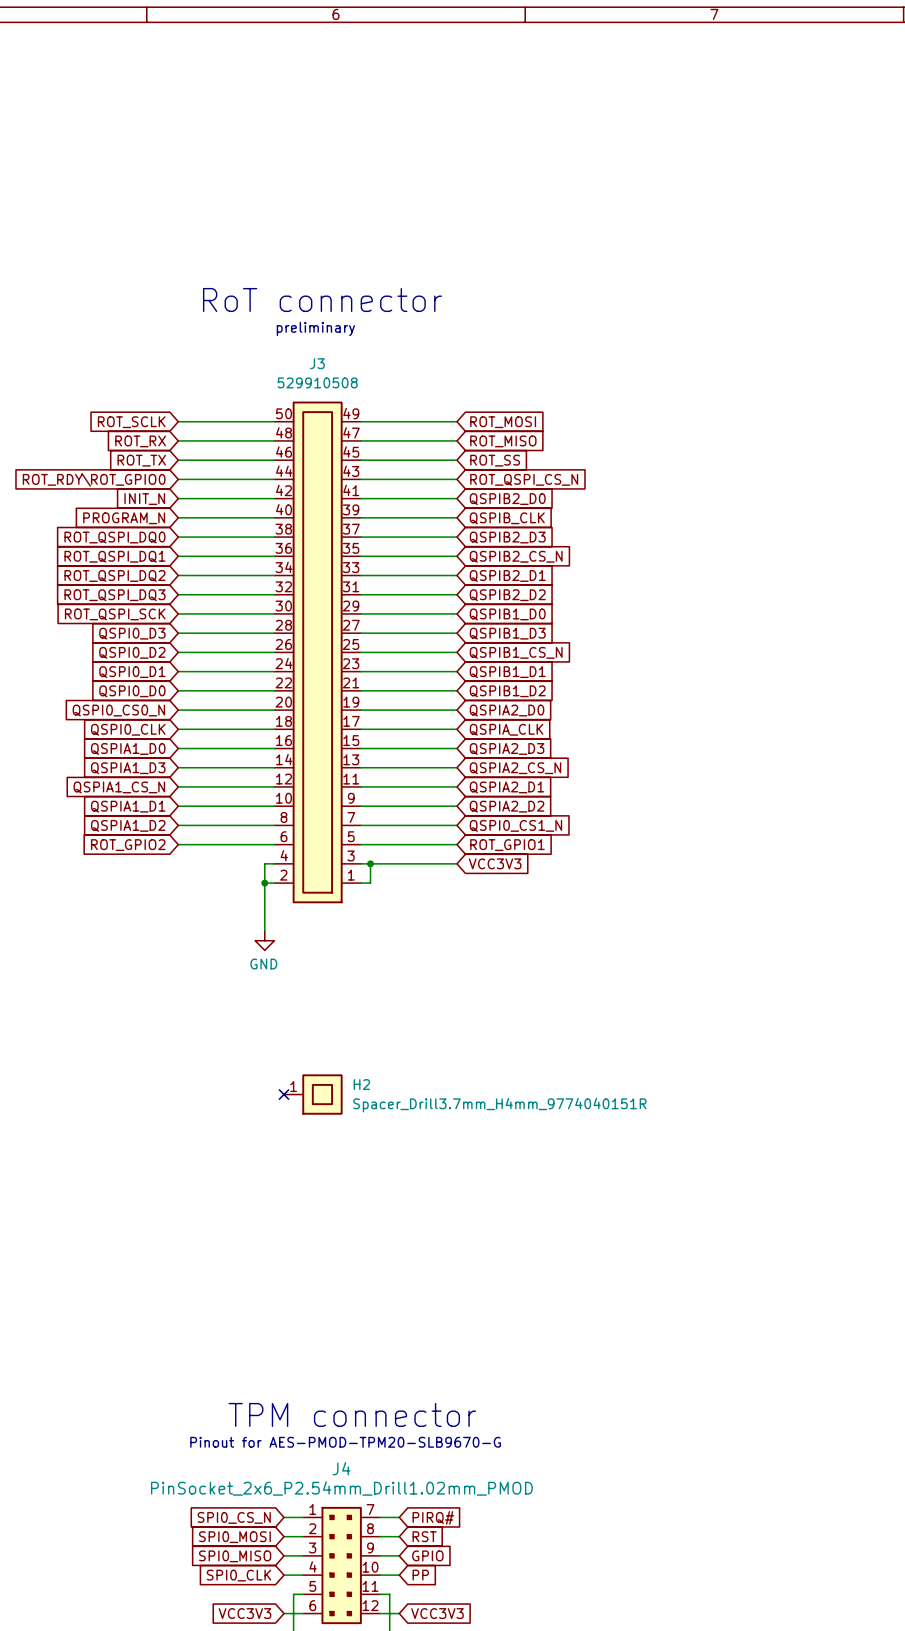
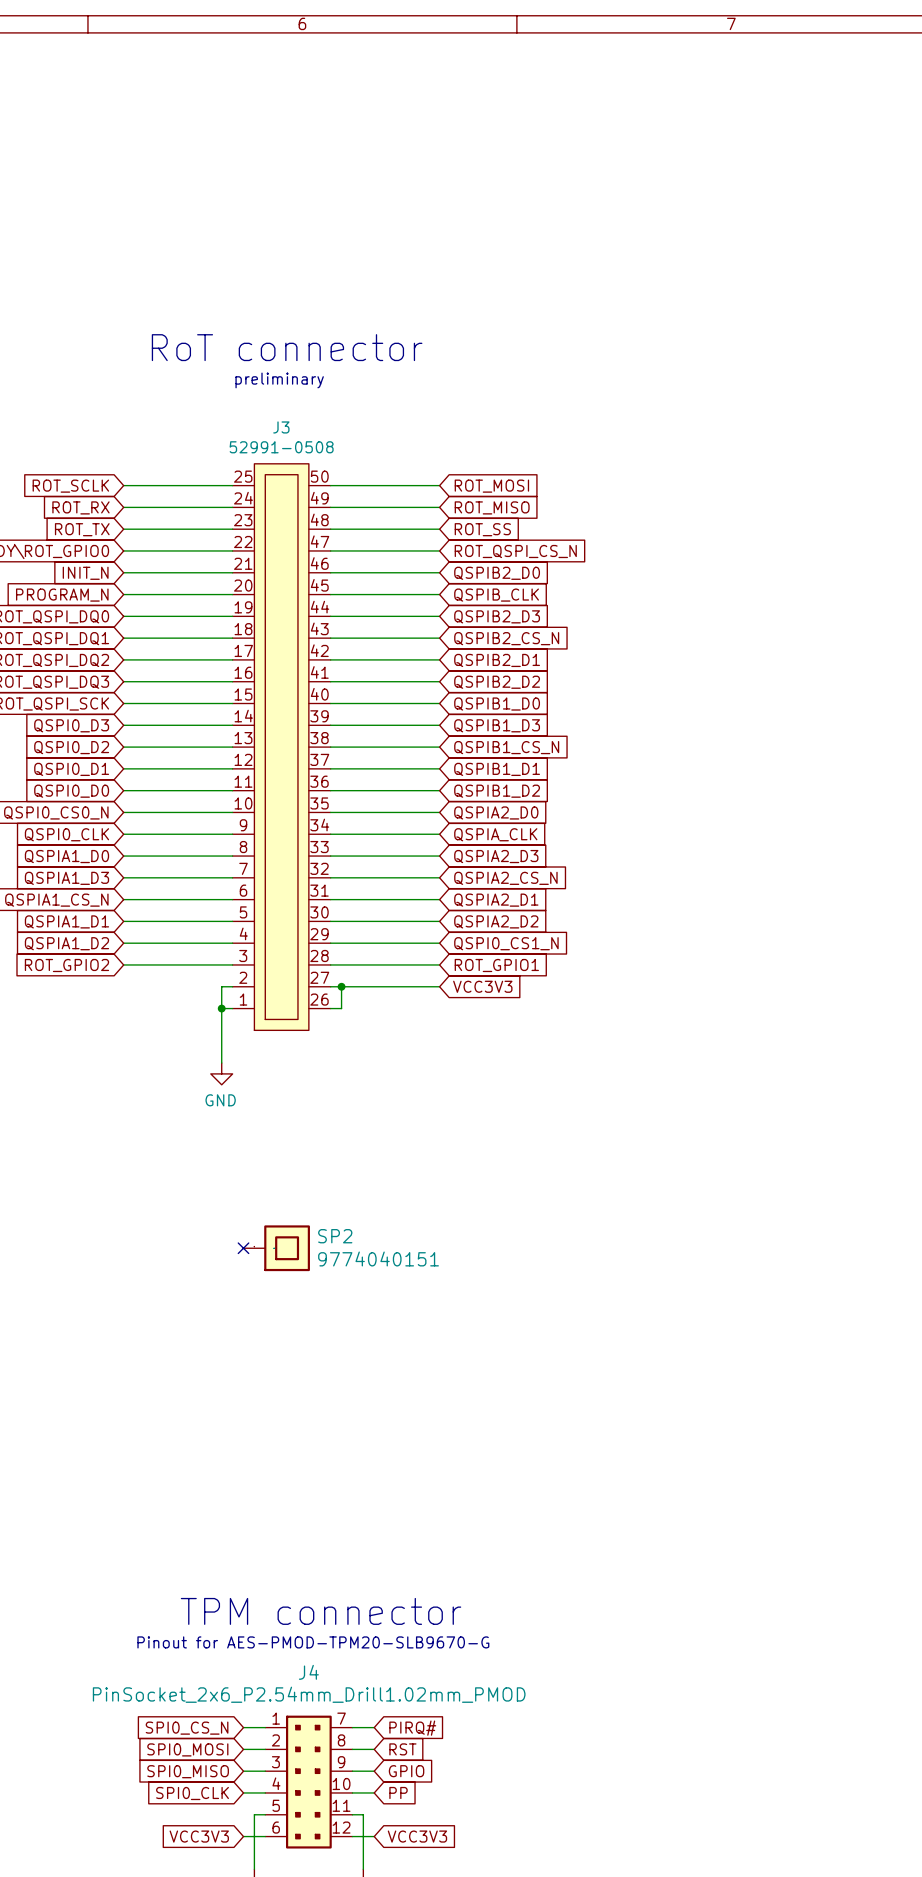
J3 text: 529910508 (317, 382) -> none
J3 value: none -> 52991-0508 (281, 447)
J3 symbol: [274, 401, 361, 904] -> [232, 463, 331, 1031]
H2 symbol: [284, 1074, 343, 1115] -> [243, 1225, 310, 1272]
H2 name: H2 (361, 1084) -> SP2 (335, 1236)
H2 value: Spacer_Drill3.7mm_H4mm_9774040151R (499, 1105) -> 9774040151 (378, 1258)

